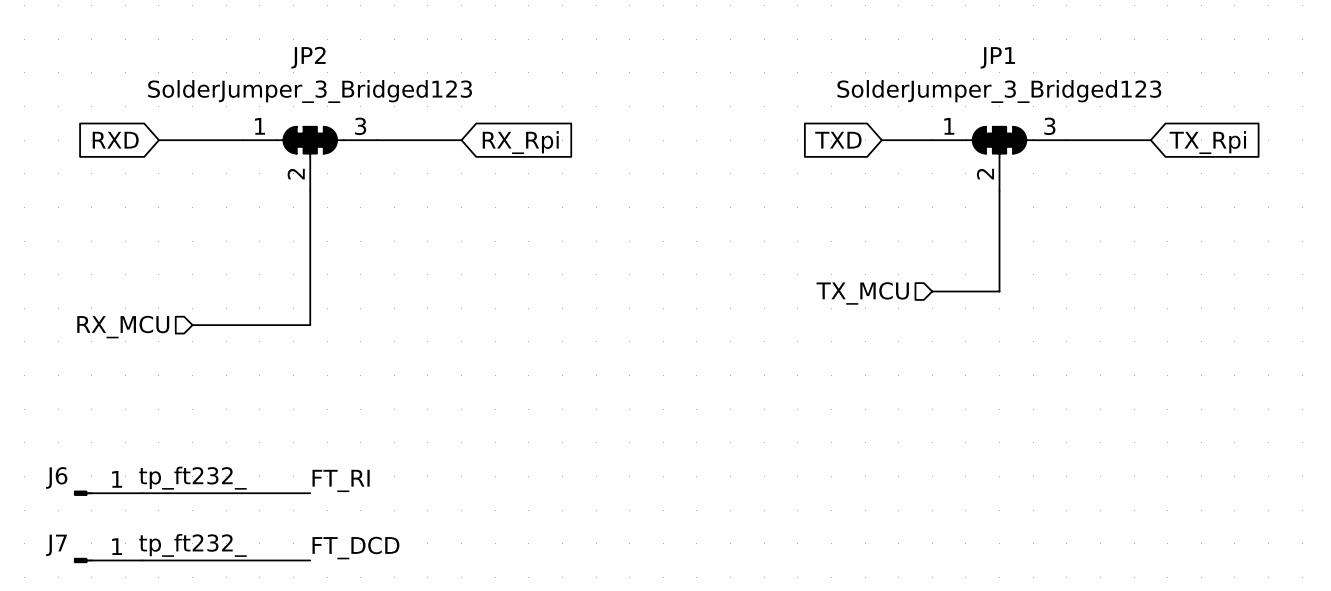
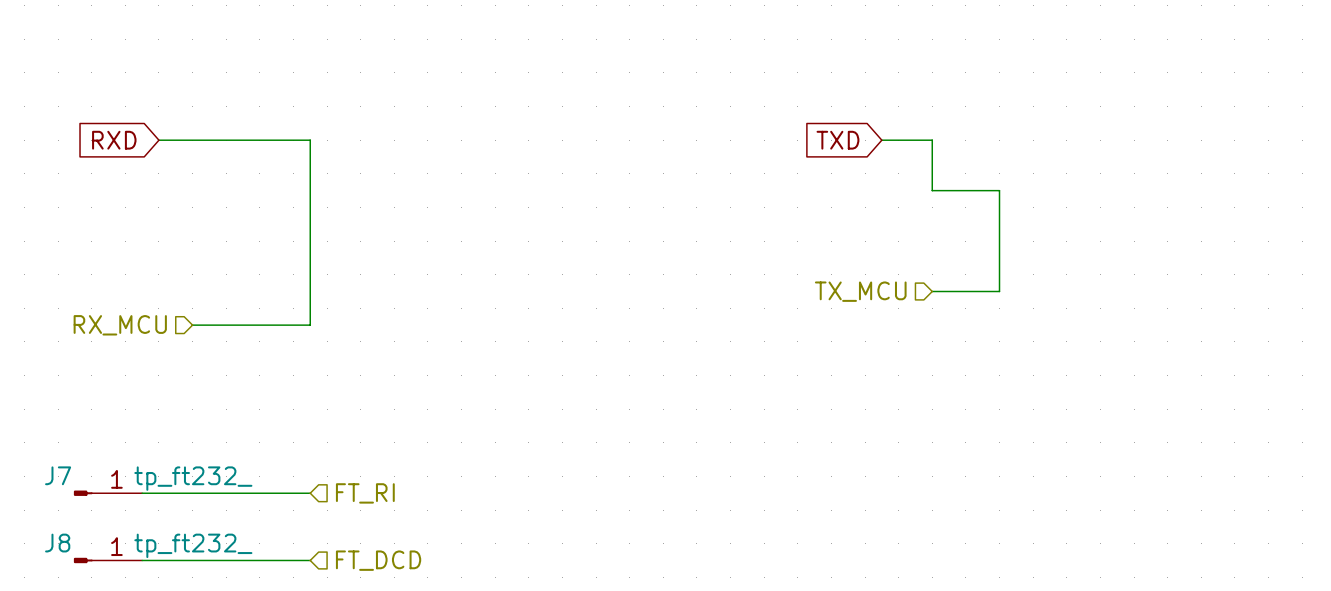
wire: (377, 140) (461, 140) -> none
wire: none -> (932, 140) (932, 190) (999, 190)
wire: (1066, 140) (1150, 140) -> none
global label: RX_Rpi (520, 142) -> none
global label: TX_Rpi (1207, 142) -> none
JP2: SolderJumper_3_Bridged123 (310, 158) -> none
JP1: SolderJumper_3_Bridged123 (999, 158) -> none
J6 name: J6 (56, 477) -> J7 (58, 475)
label: FT_RI (341, 480) -> none
hierarchical label: none -> FT_RI (365, 493)
J7 name: J7 (56, 545) -> J8 (57, 543)
label: FT_DCD (355, 548) -> none
hierarchical label: none -> FT_DCD (378, 560)

